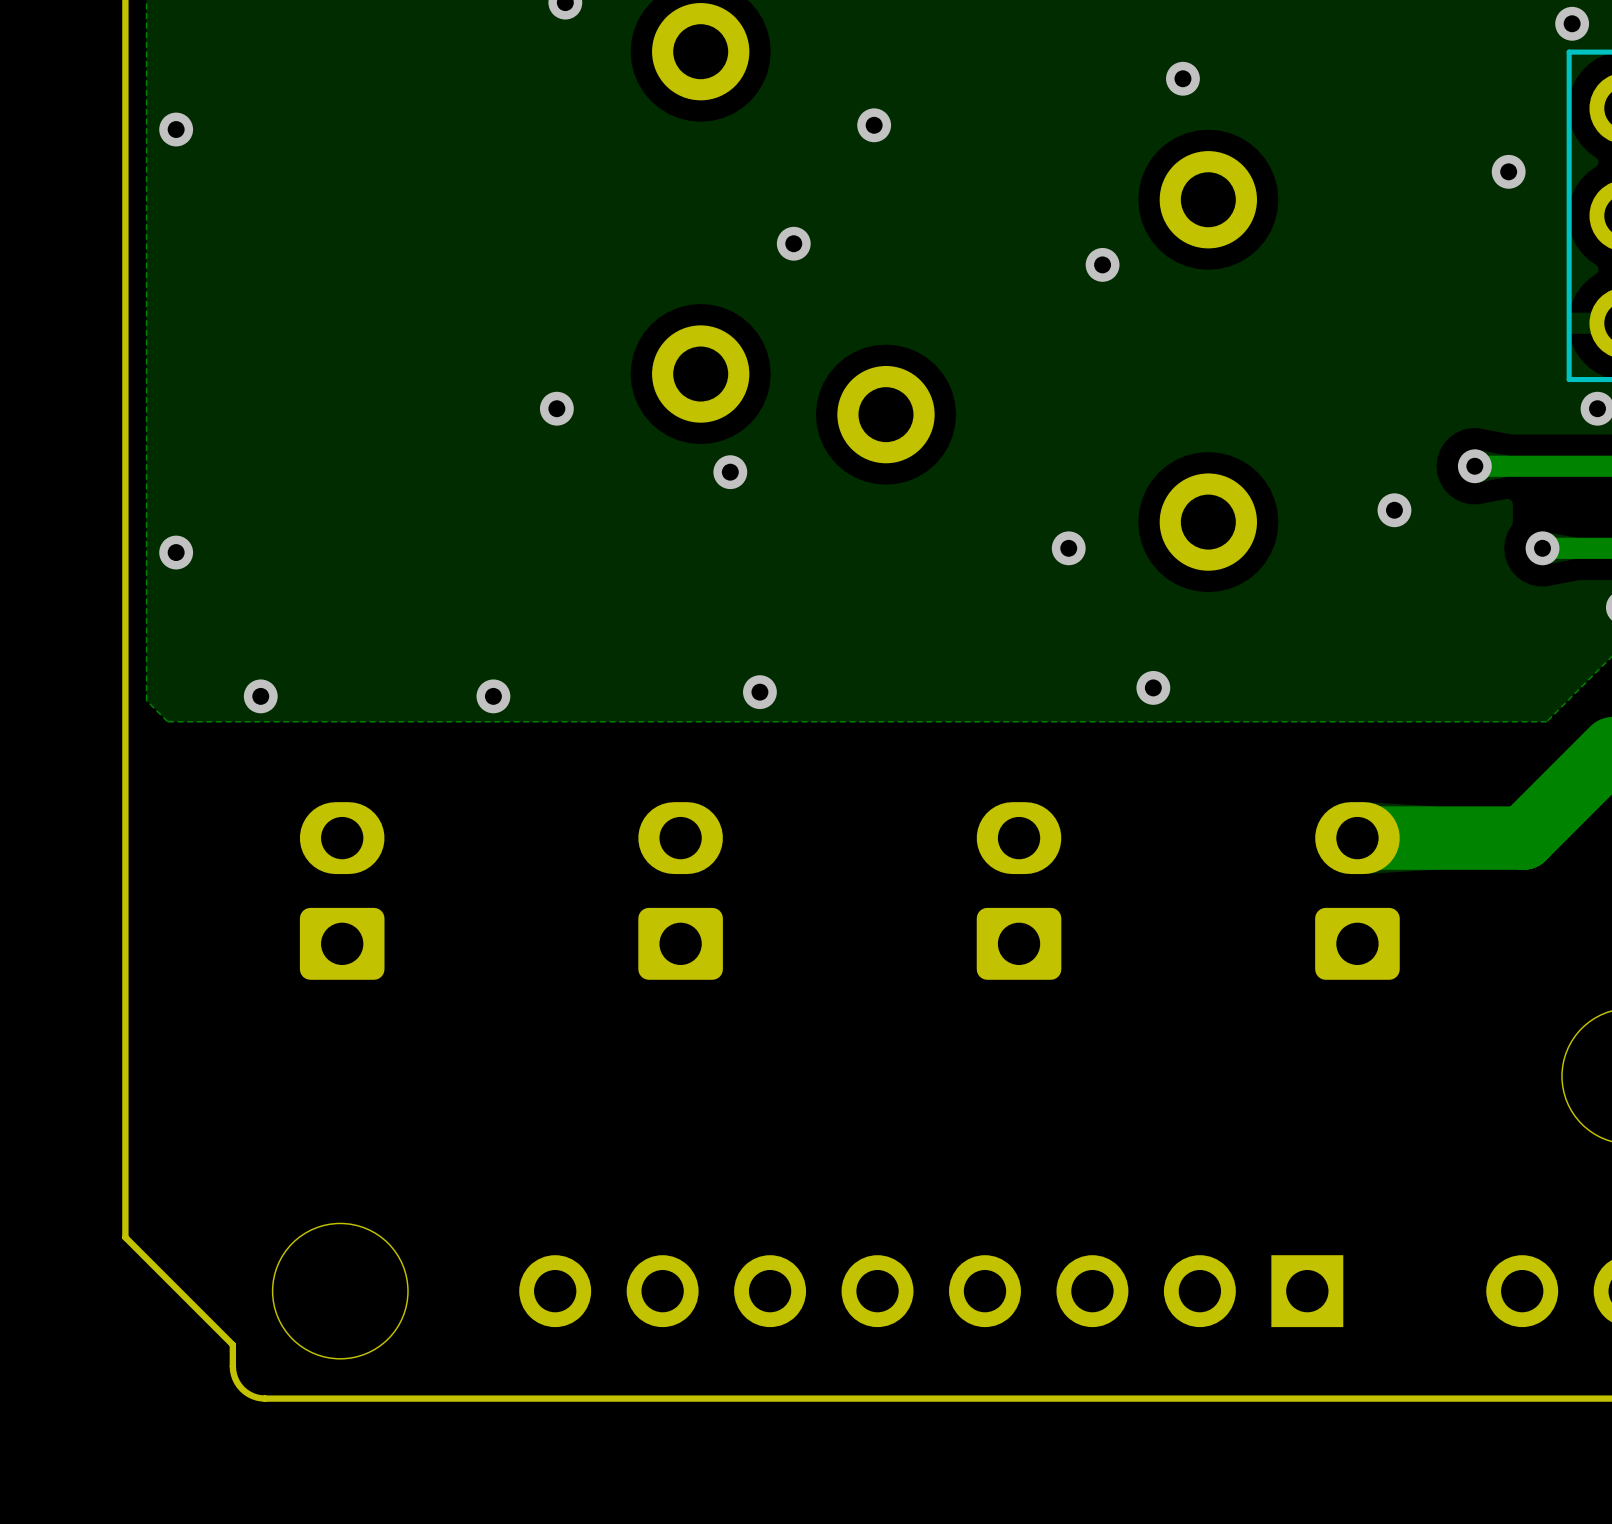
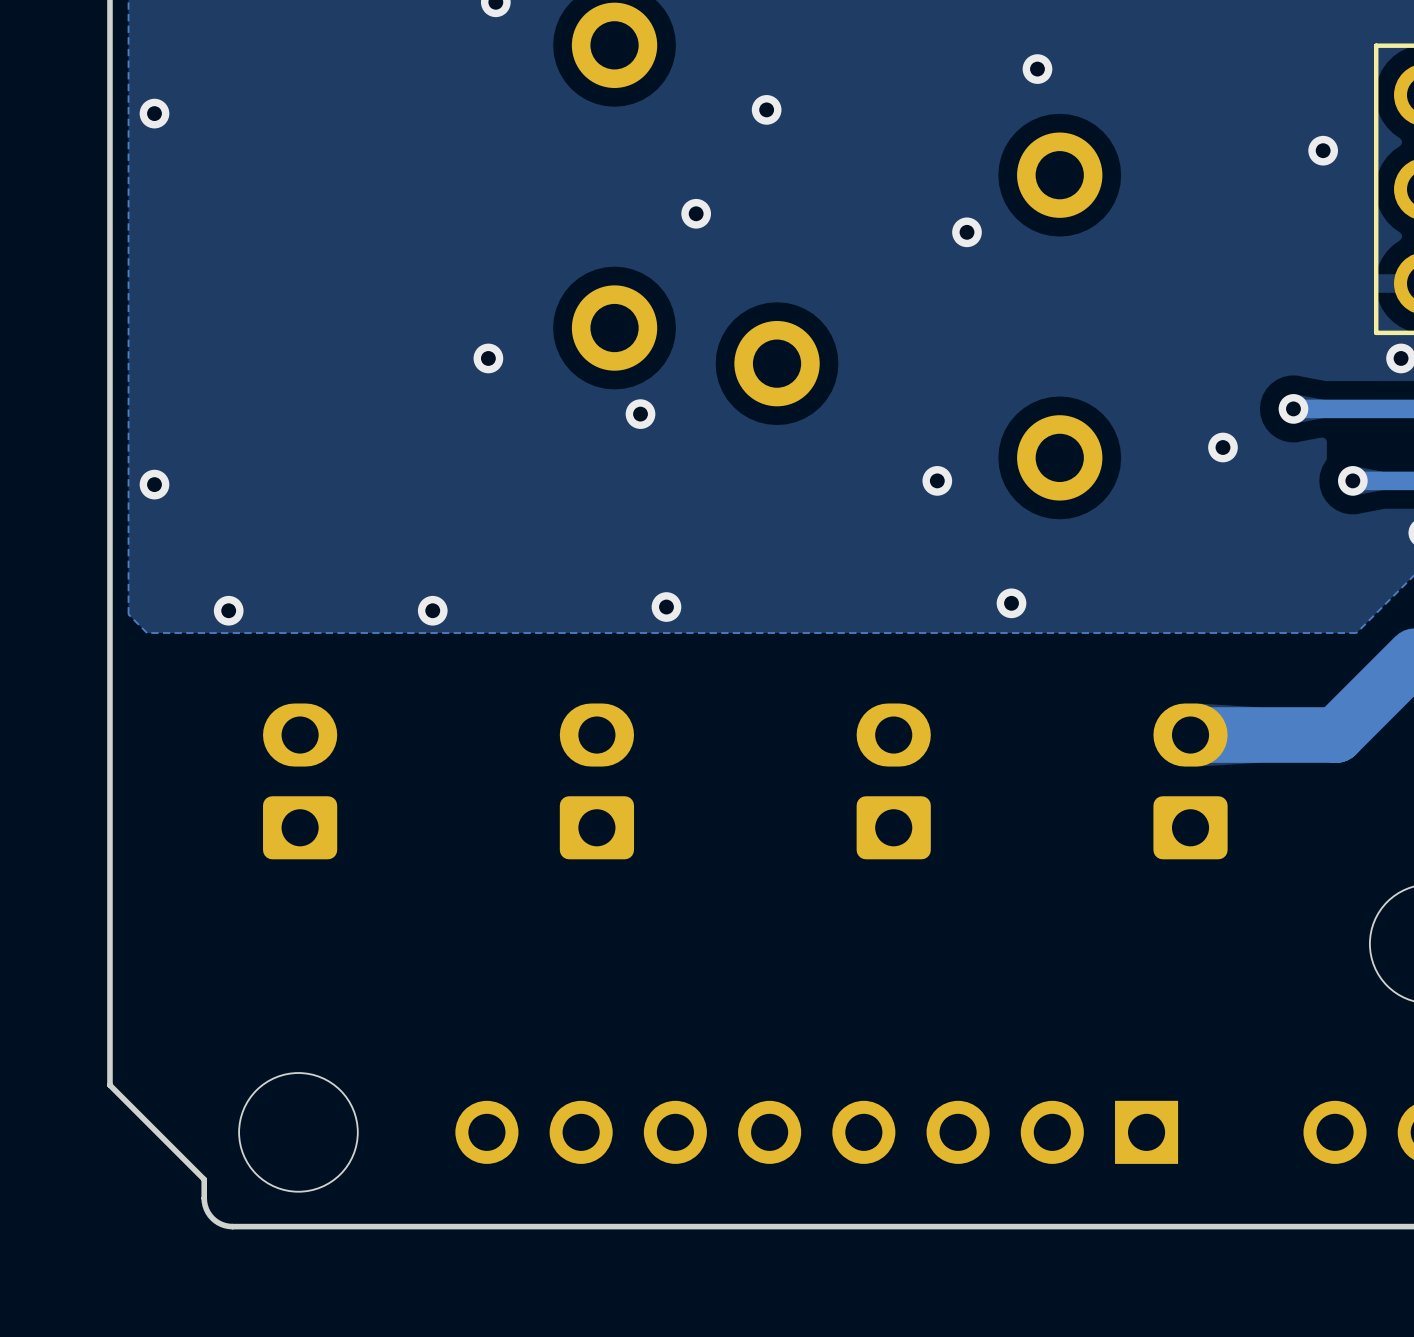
via: (1572, 23) -> none

